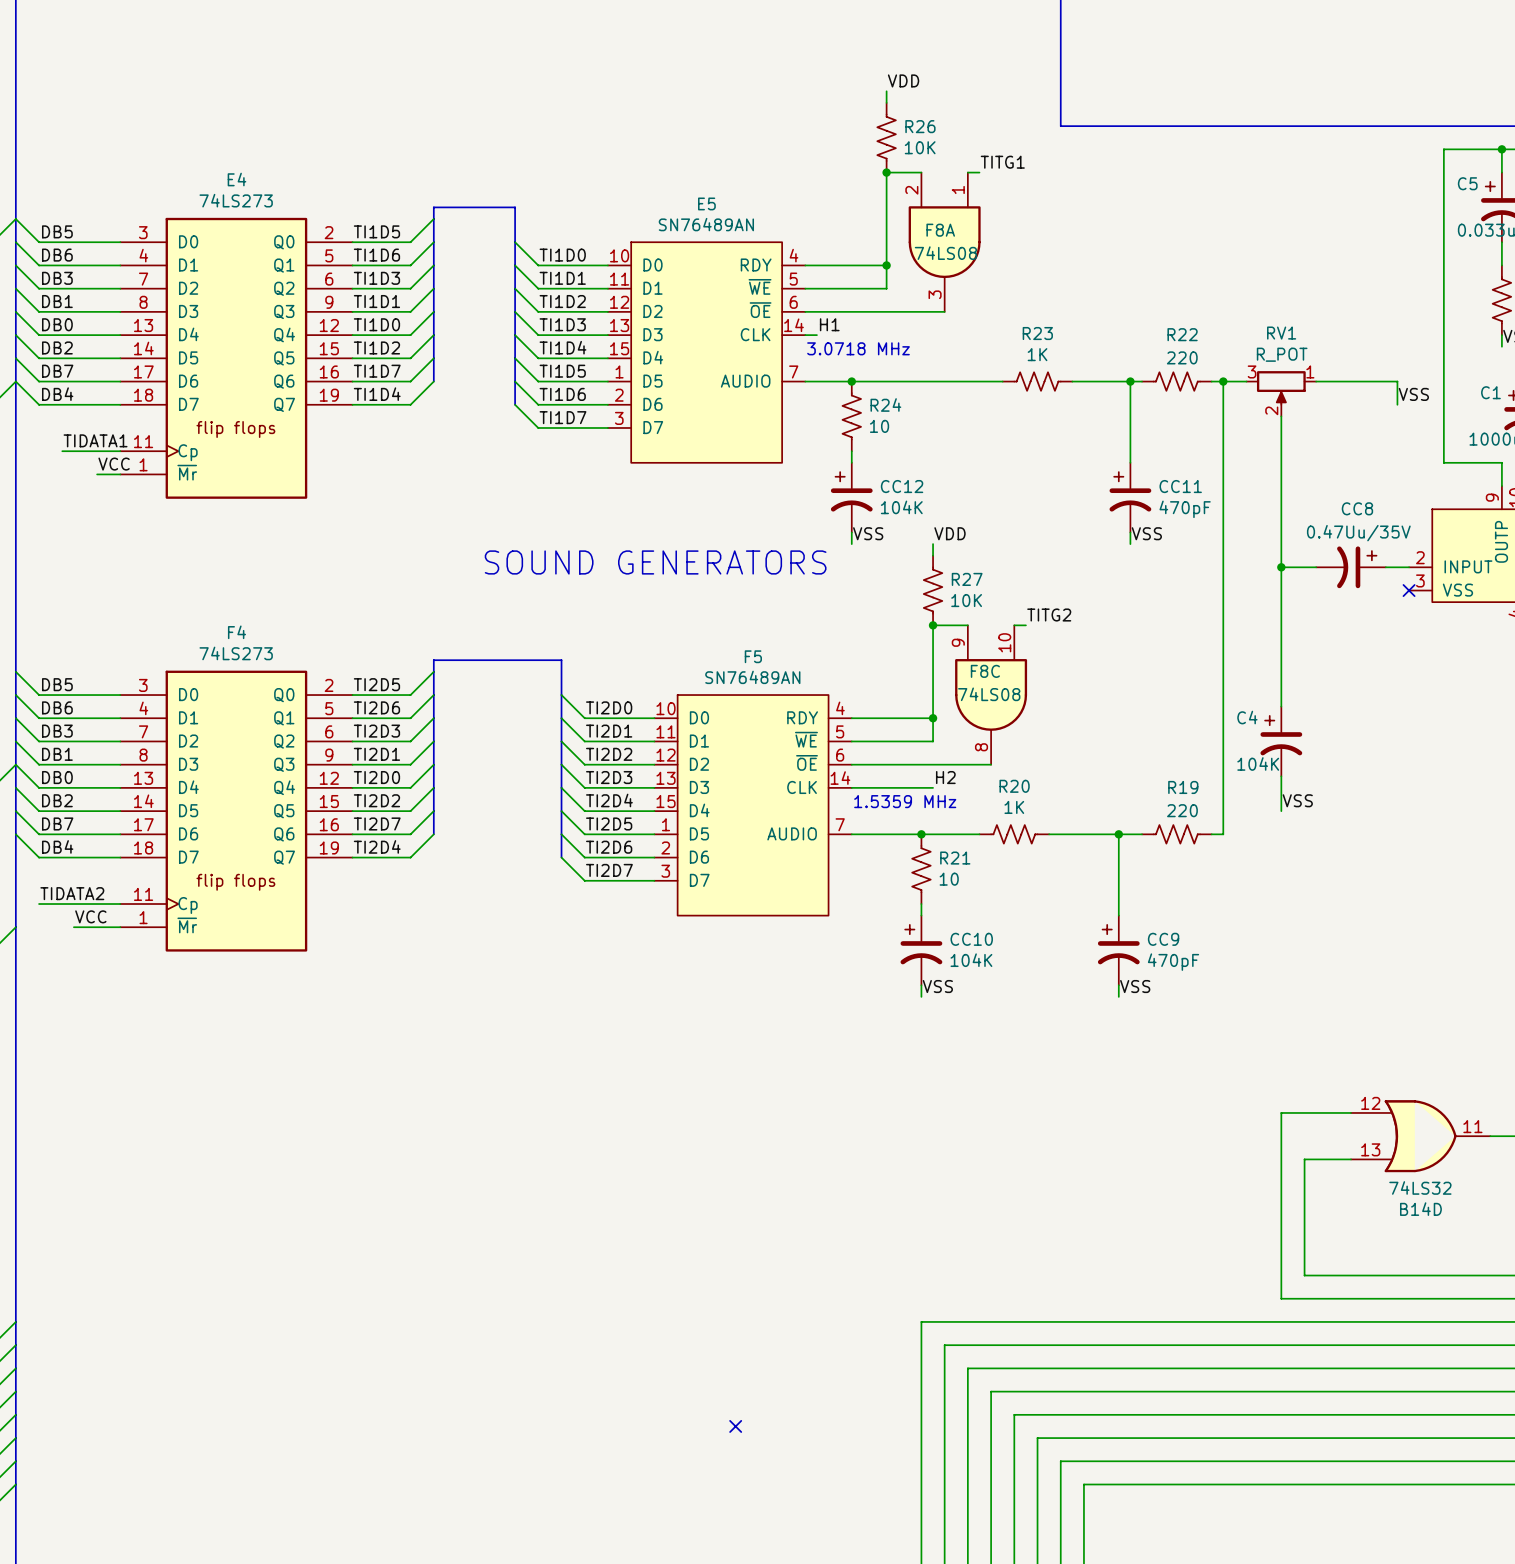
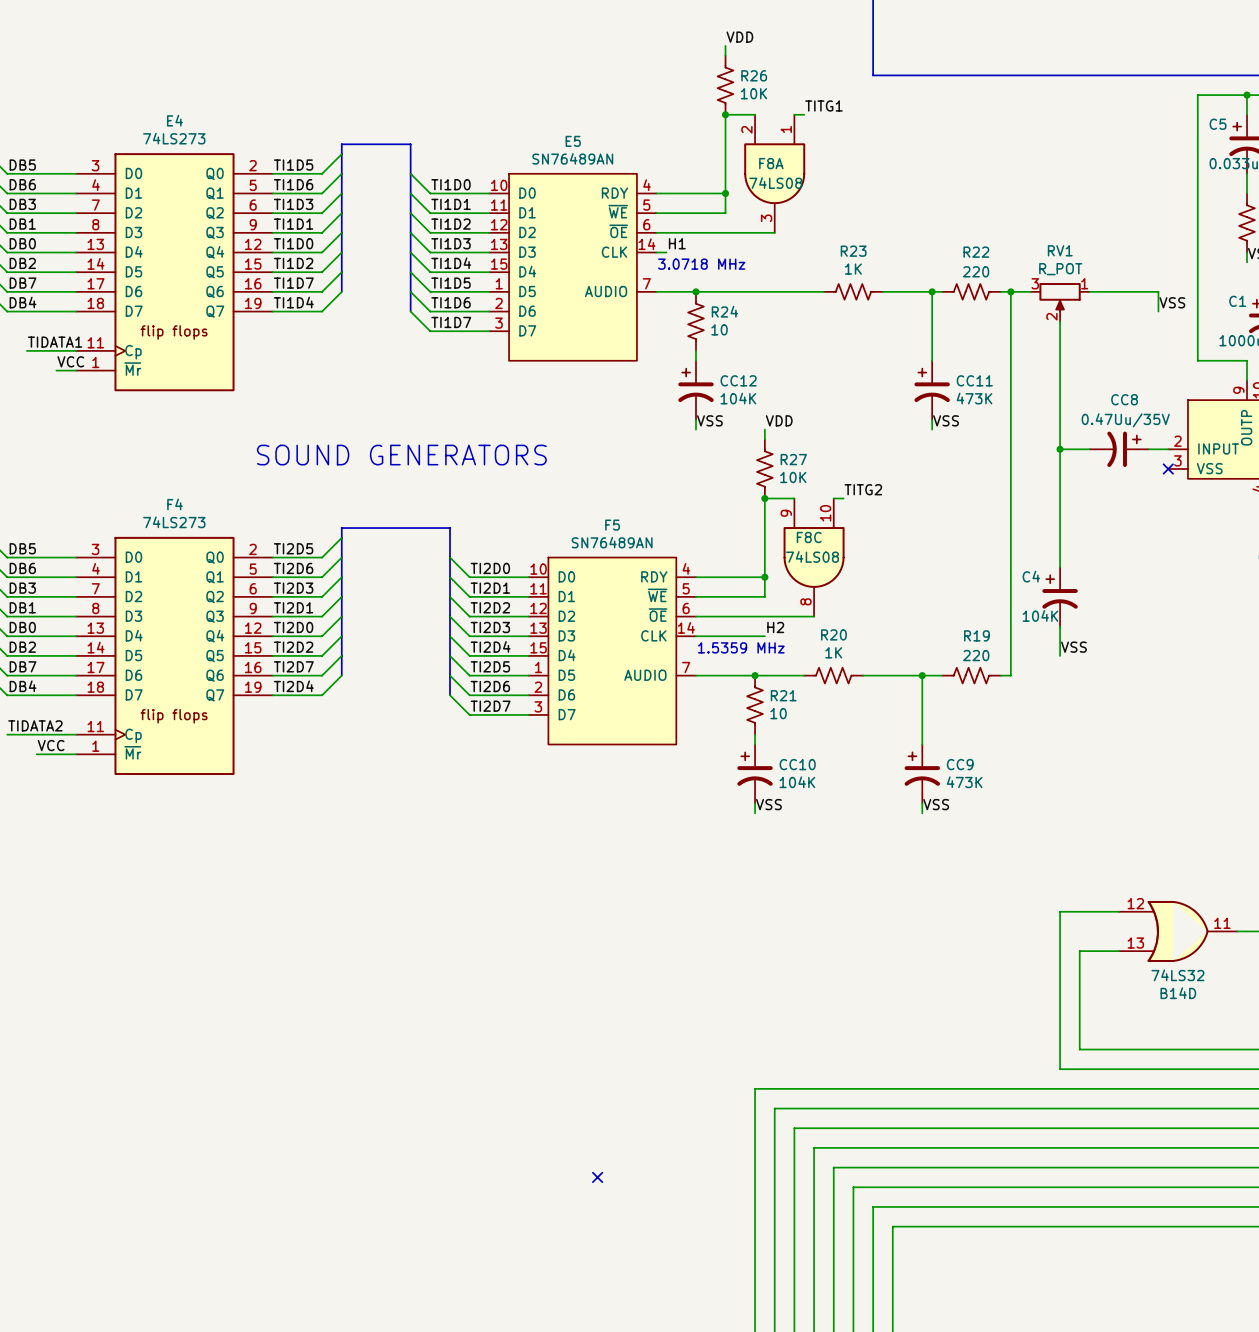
CC11 value: 470pF (1185, 509) -> 473K (974, 398)
text position: SOUND GENERATORS (655, 562) -> SOUND GENERATORS (401, 455)
CC9 value: 470pF (1173, 962) -> 473K (964, 782)

